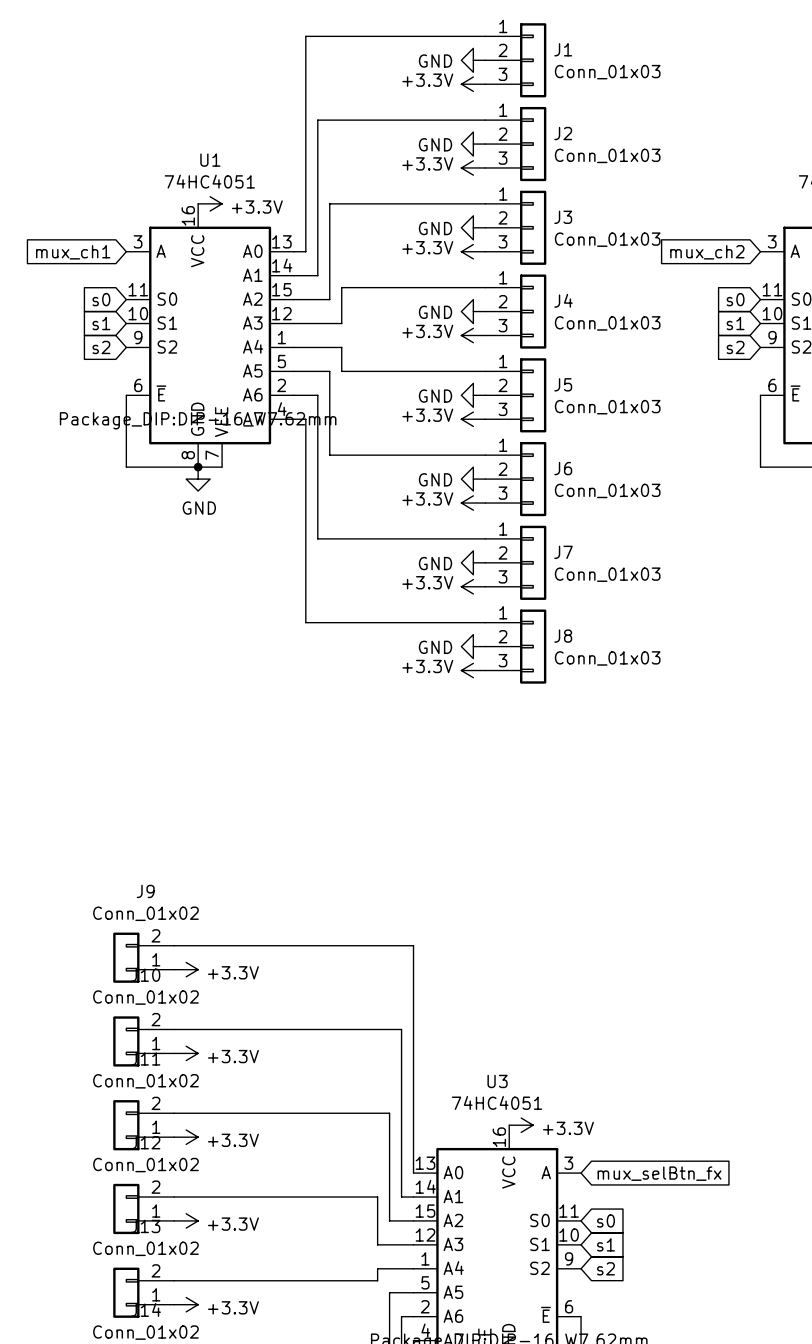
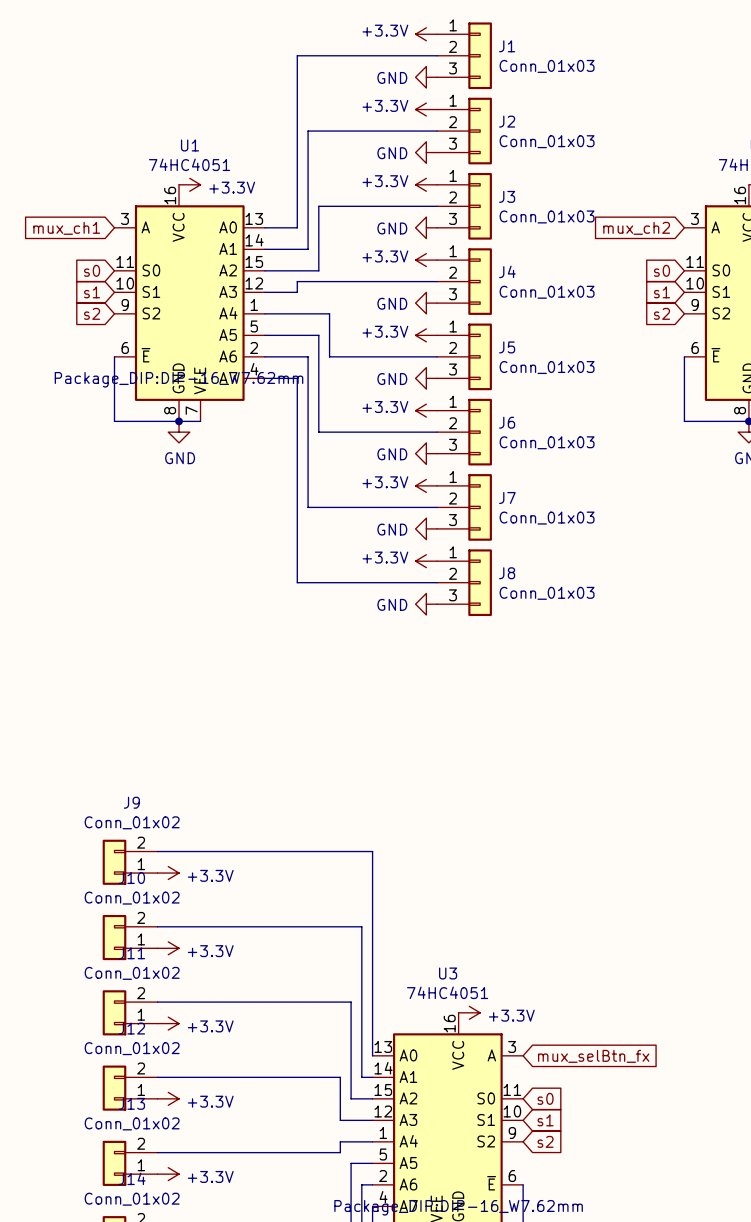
power symbol: none -> +3.3V (426, 34)
wire: (485, 36) (305, 36) (305, 251) -> none
power symbol: GND (473, 60) -> none
power symbol: +3.3V (473, 84) -> GND (426, 77)
power symbol: none -> +3.3V (426, 109)
wire: (485, 120) (317, 120) (317, 275) -> (437, 131) (308, 131) (308, 249) (286, 249)
power symbol: GND (473, 144) -> none
power symbol: +3.3V (473, 167) -> GND (426, 152)
wire: (329, 203) (485, 203) -> (297, 184) (297, 55) (437, 55)
power symbol: none -> +3.3V (426, 184)
power symbol: GND (473, 227) -> none
wire: none -> (437, 206) (318, 206) (318, 270) (297, 270)
wire: (329, 251) (329, 299) -> (297, 227) (275, 227)
power symbol: +3.3V (473, 251) -> GND (426, 227)
power symbol: none -> +3.3V (426, 260)
wire: (485, 287) (341, 287) (341, 323) (329, 323) -> (437, 281) (297, 281) (297, 292)
power symbol: GND (473, 311) -> none
power symbol: +3.3V (473, 335) -> GND (426, 303)
wire: (341, 347) (341, 371) -> (297, 335) (308, 335)
wire: none -> (308, 313) (329, 313) (329, 356) (437, 356)
wire: (329, 371) (329, 419) -> (275, 378) (297, 378)
wire: (353, 371) (485, 371) -> (318, 335) (318, 432) (437, 432)
power symbol: none -> +3.3V (426, 335)
wire: (317, 395) (317, 538) (485, 538) -> (286, 356) (308, 356) (308, 507) (437, 507)
power symbol: GND (473, 395) -> none
wire: (305, 419) (305, 622) (485, 622) -> none
power symbol: +3.3V (473, 419) -> GND (426, 378)
wire: (329, 455) (485, 455) -> (297, 410) (297, 582) (437, 582)
power symbol: none -> +3.3V (426, 410)
power symbol: GND (473, 479) -> none
power symbol: +3.3V (473, 503) -> GND (426, 453)
power symbol: none -> +3.3V (426, 485)
power symbol: GND (473, 562) -> none
power symbol: +3.3V (473, 586) -> GND (426, 528)
power symbol: none -> +3.3V (426, 561)
power symbol: GND (473, 646) -> none
power symbol: +3.3V (473, 670) -> GND (426, 604)

